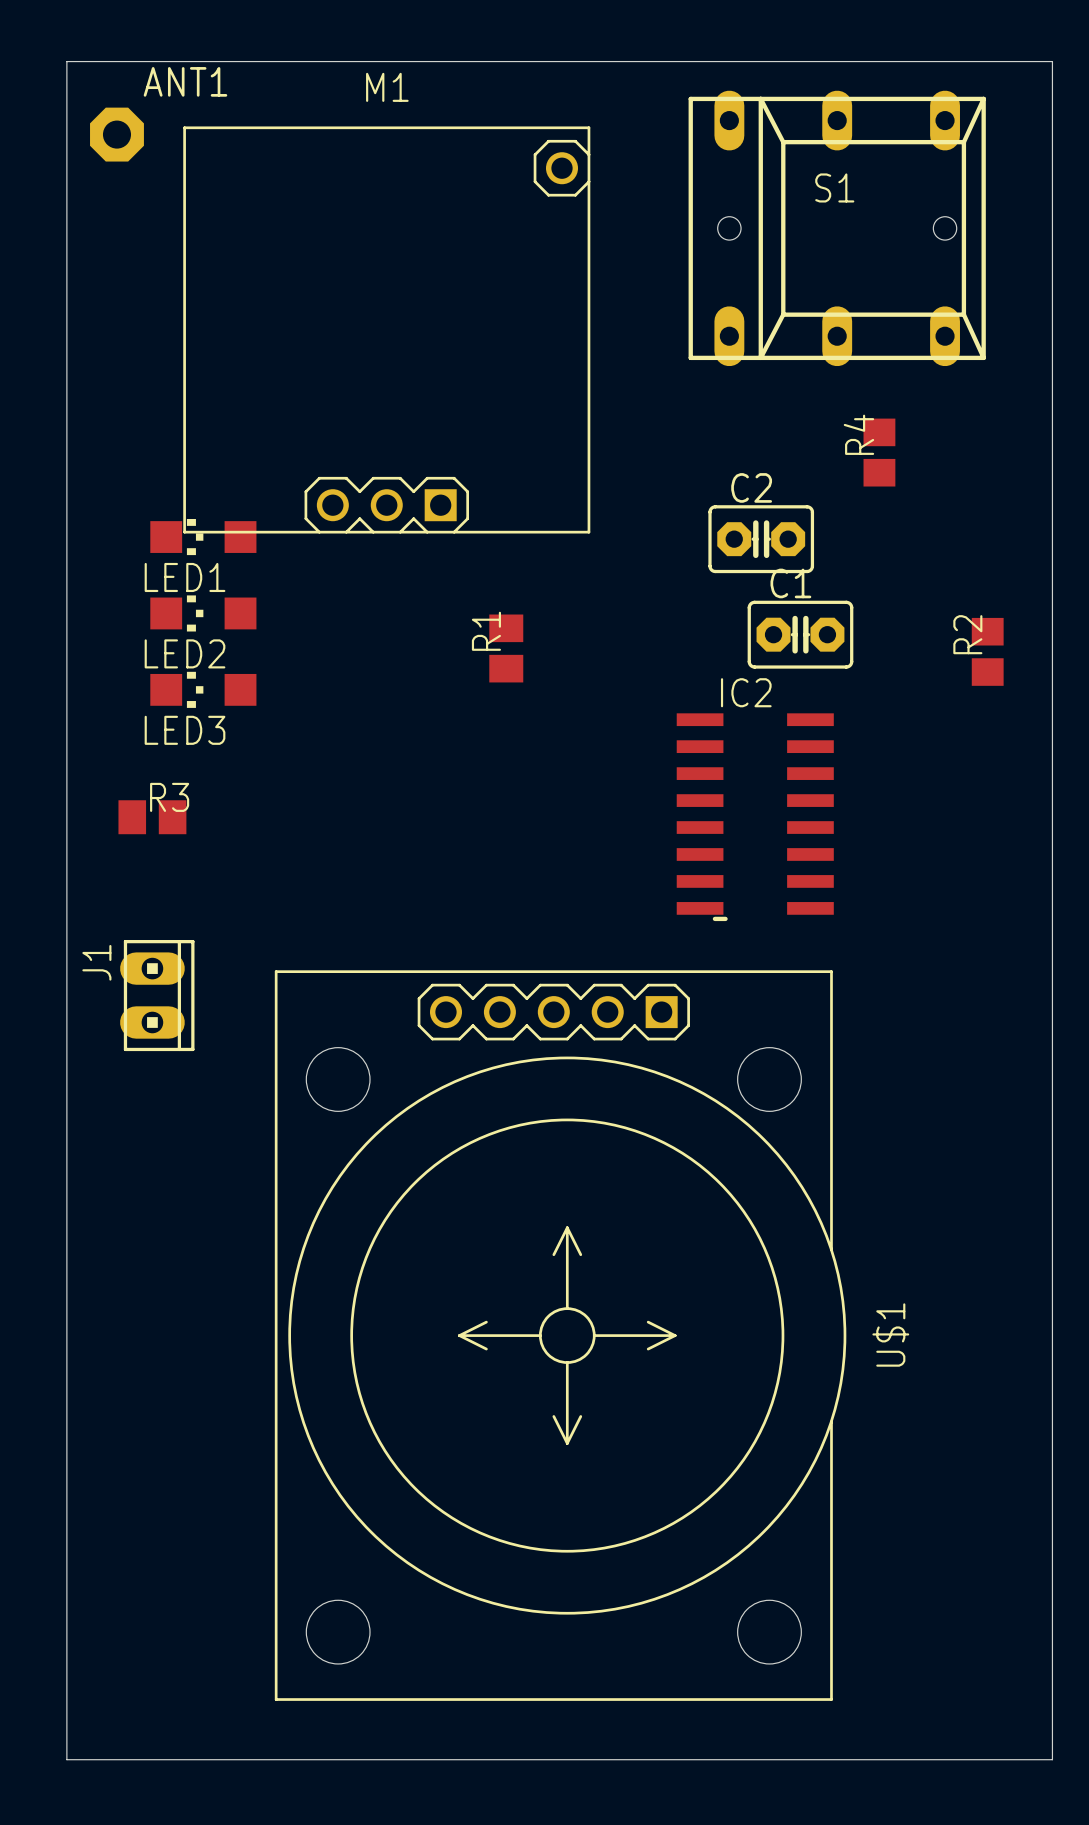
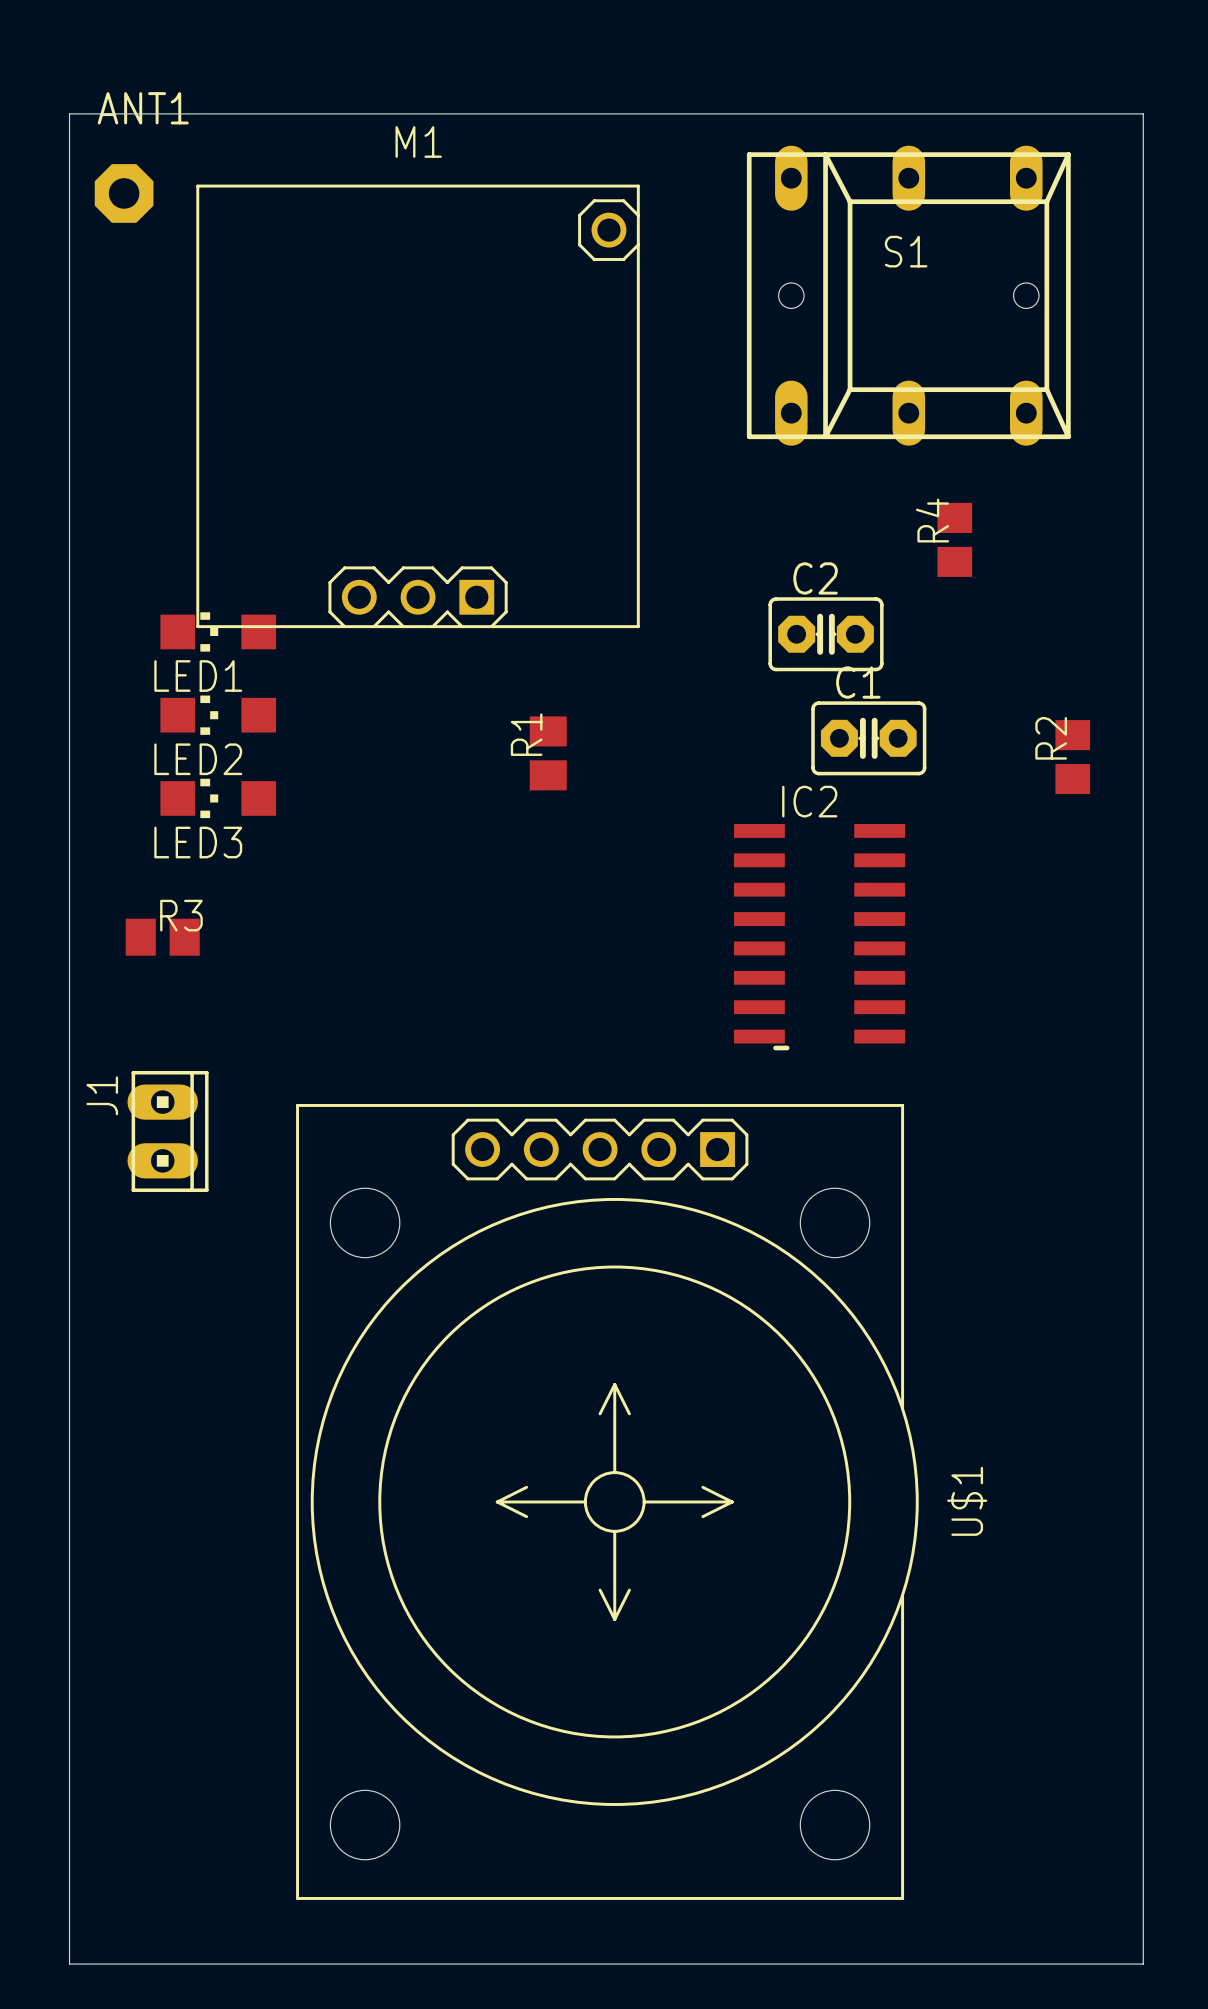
ANT1 name position: ANT1 (185, 81) -> ANT1 (143, 108)

